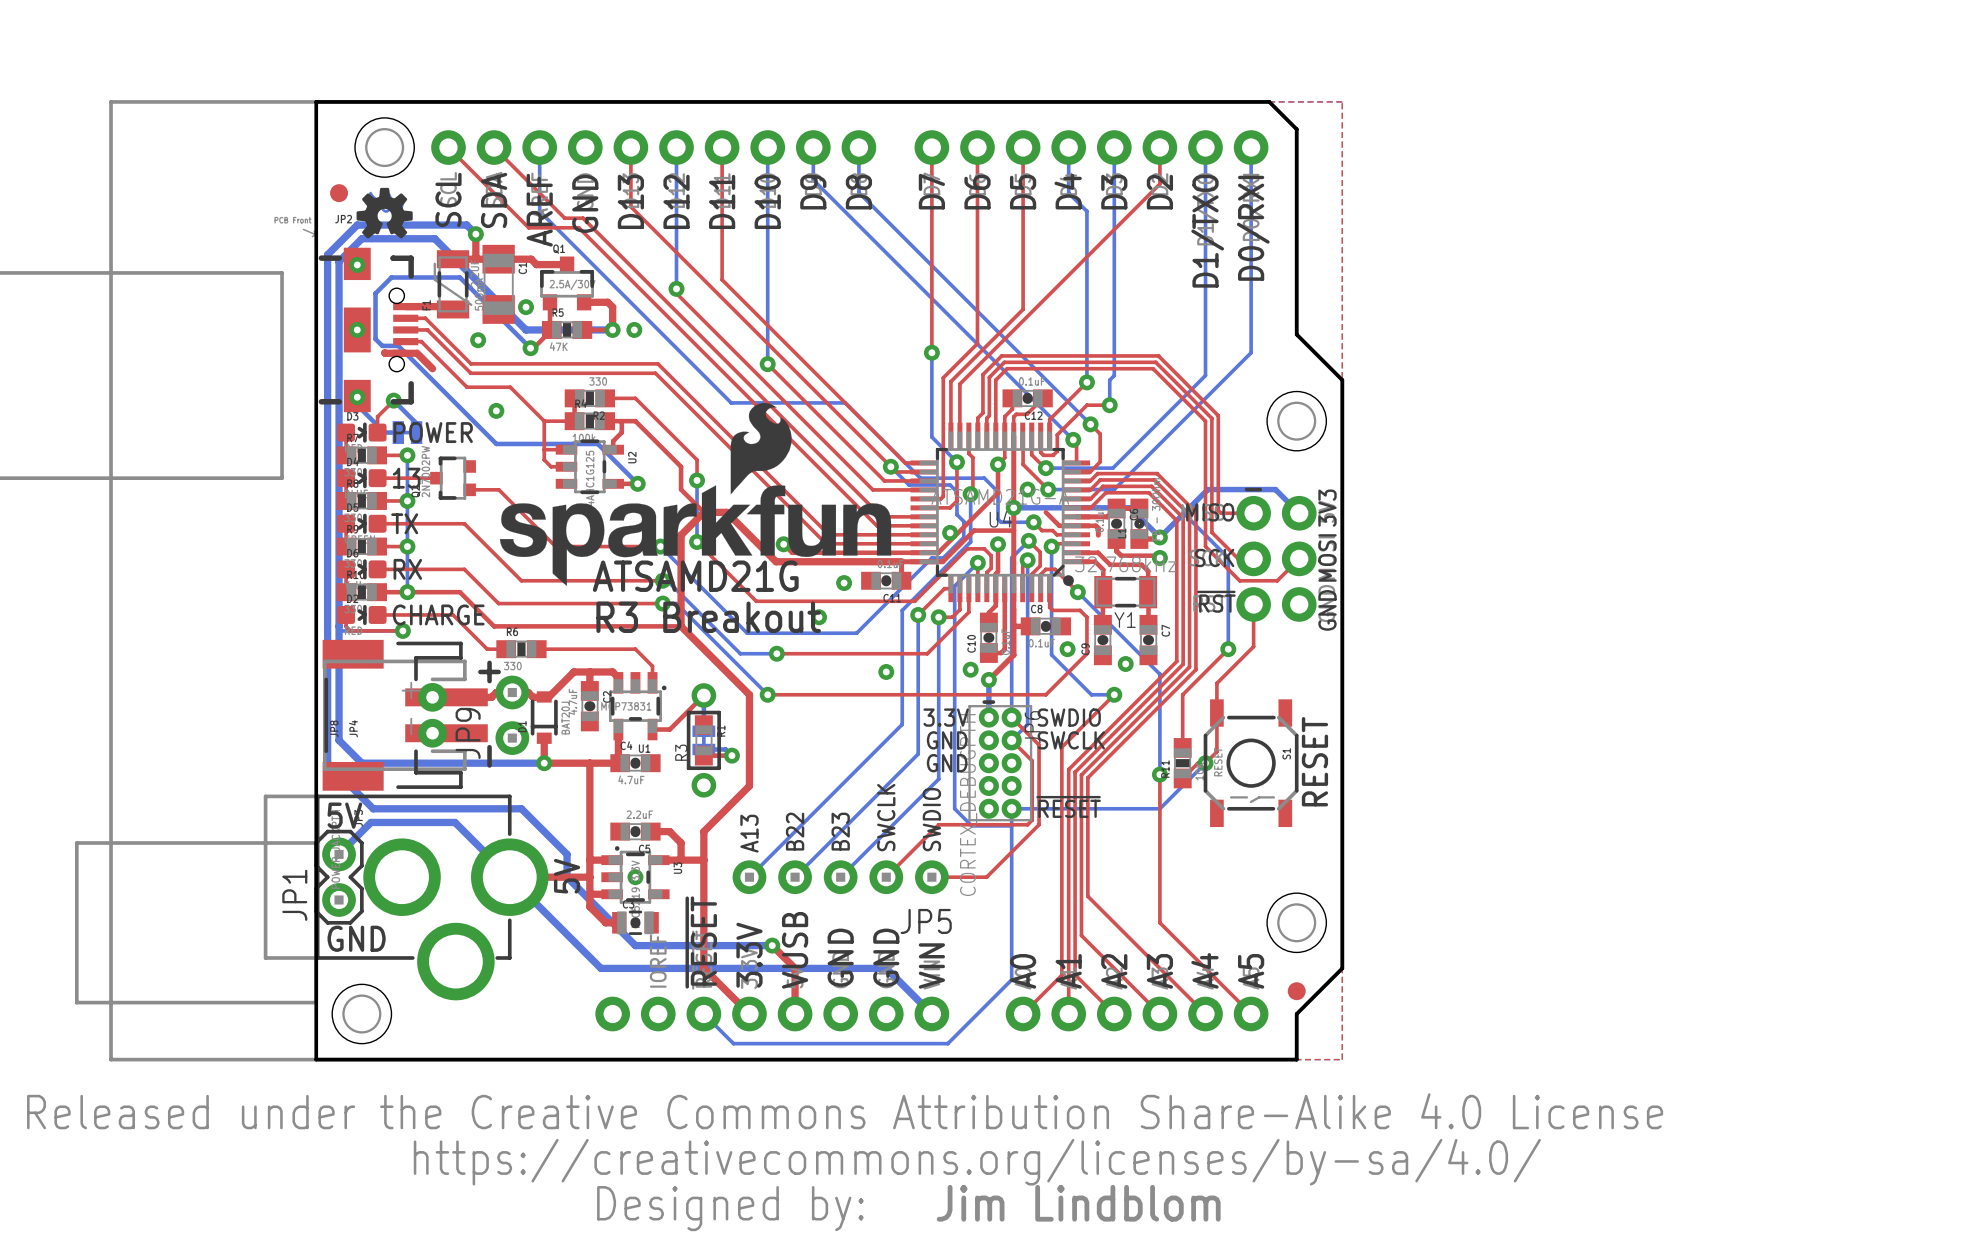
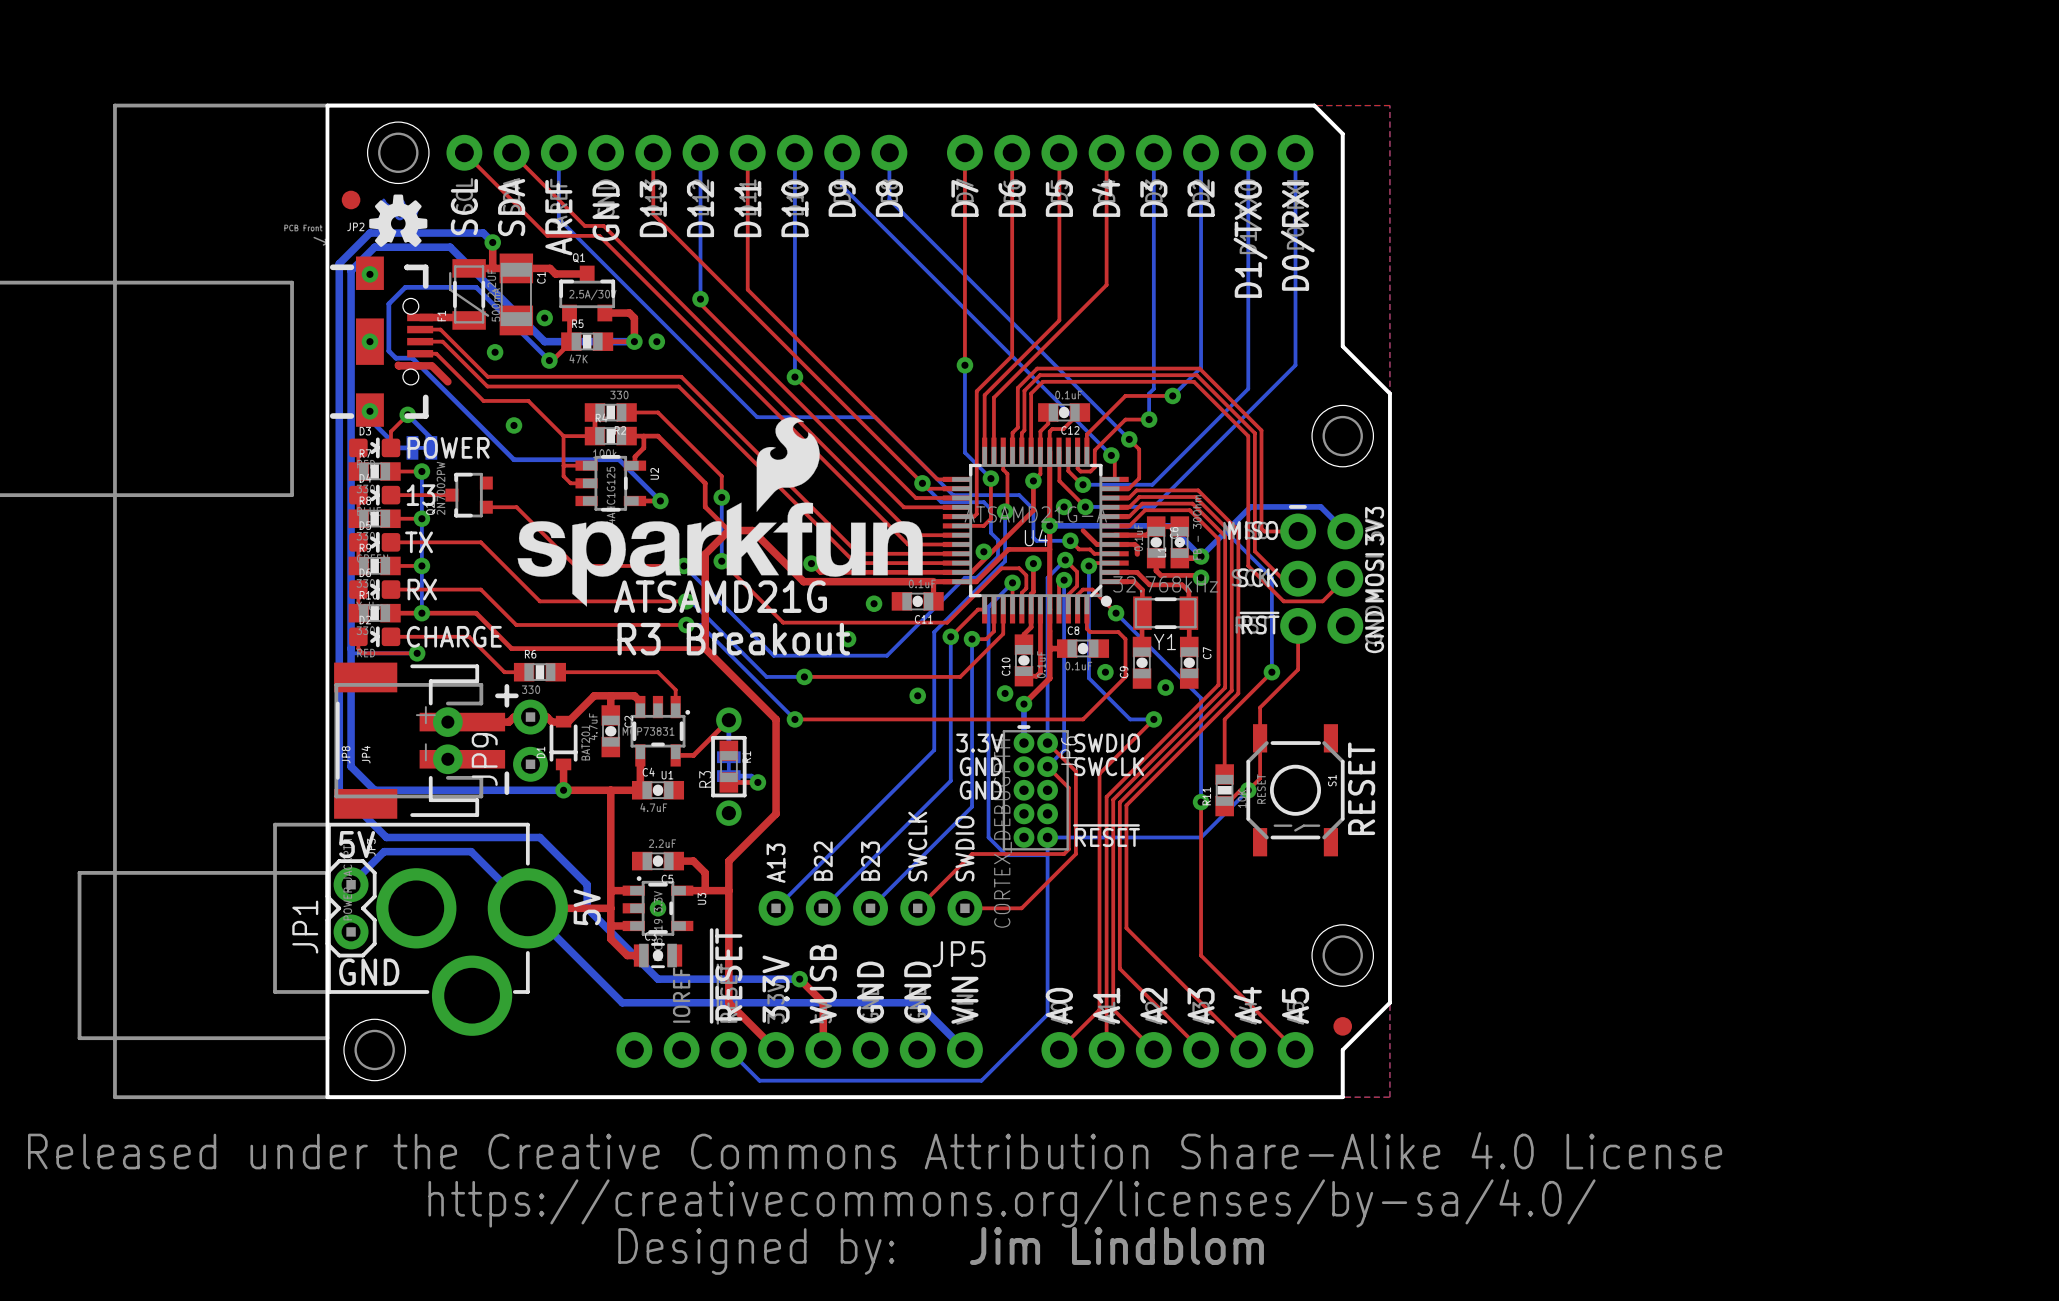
bottom track: (1068, 147) (1068, 193) (1086, 211) (1086, 382) -> none
top track: (1159, 147) (1159, 184) (1068, 275) -> (1106, 152) (1106, 284)
bottom track: none -> (1201, 152) (1201, 367) (1172, 395)
top track: none -> (1125, 395) (1172, 395)
via position: (1086, 382) -> (1172, 395)

